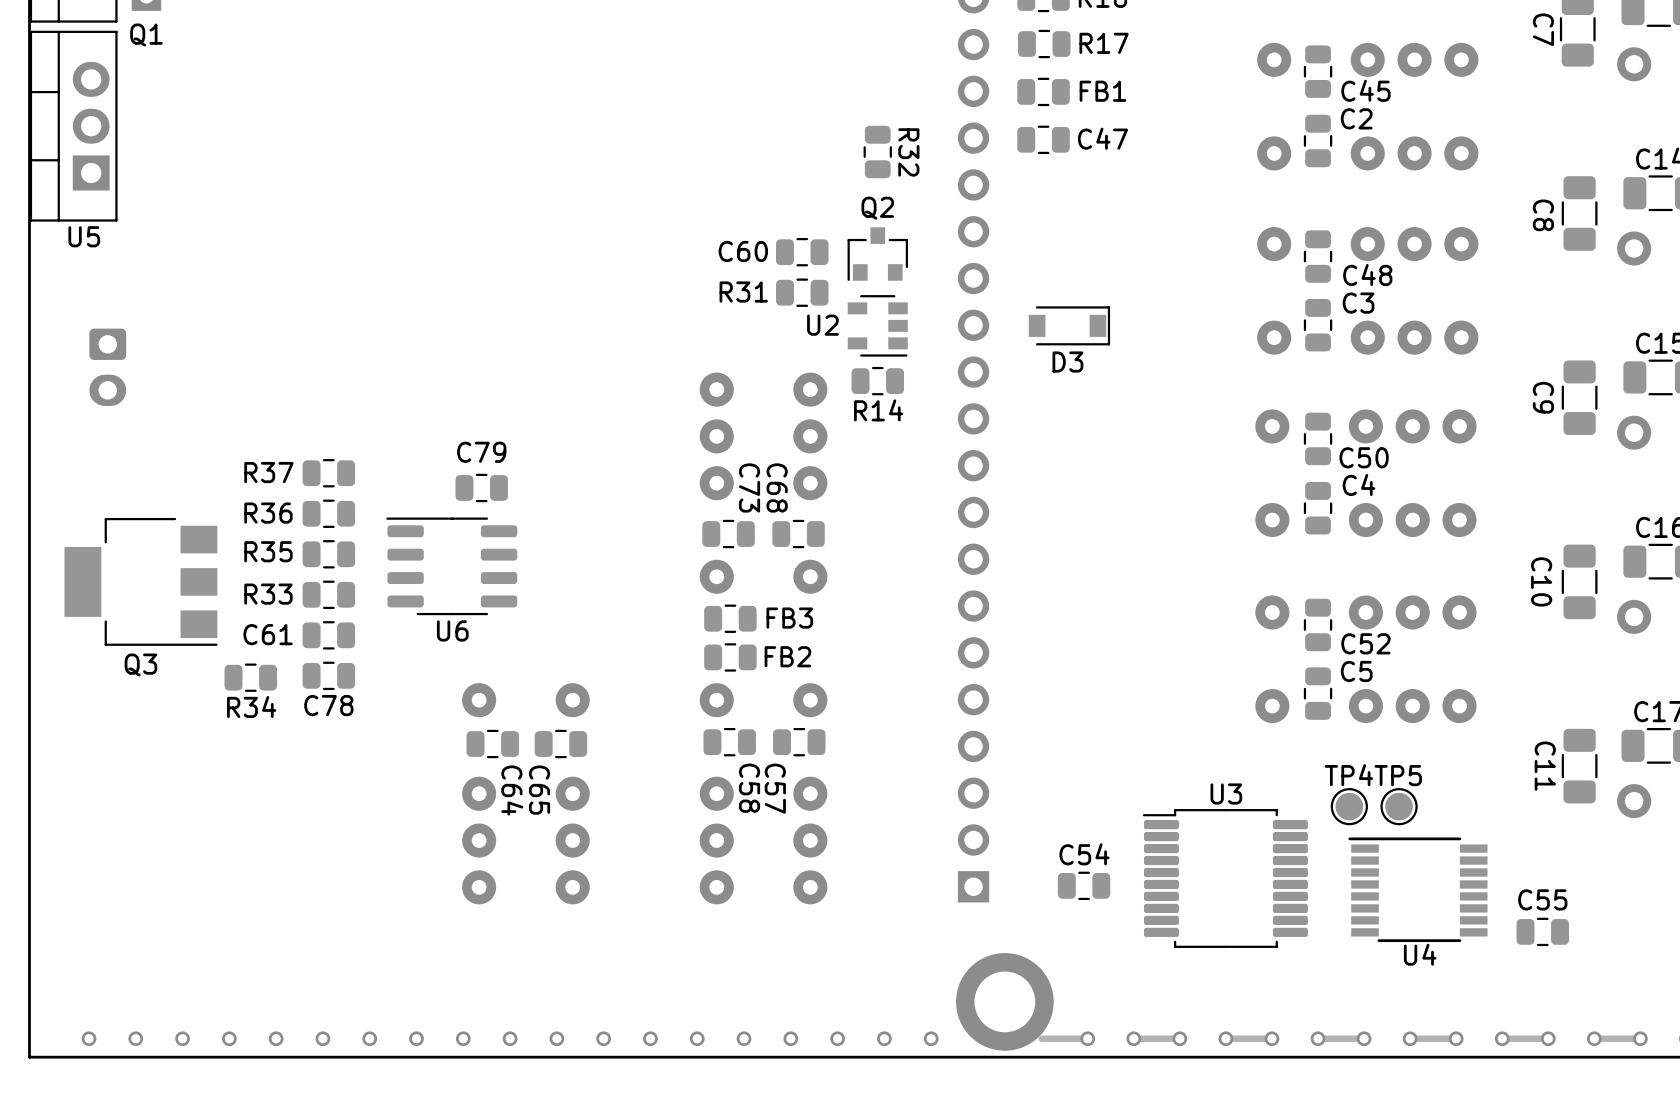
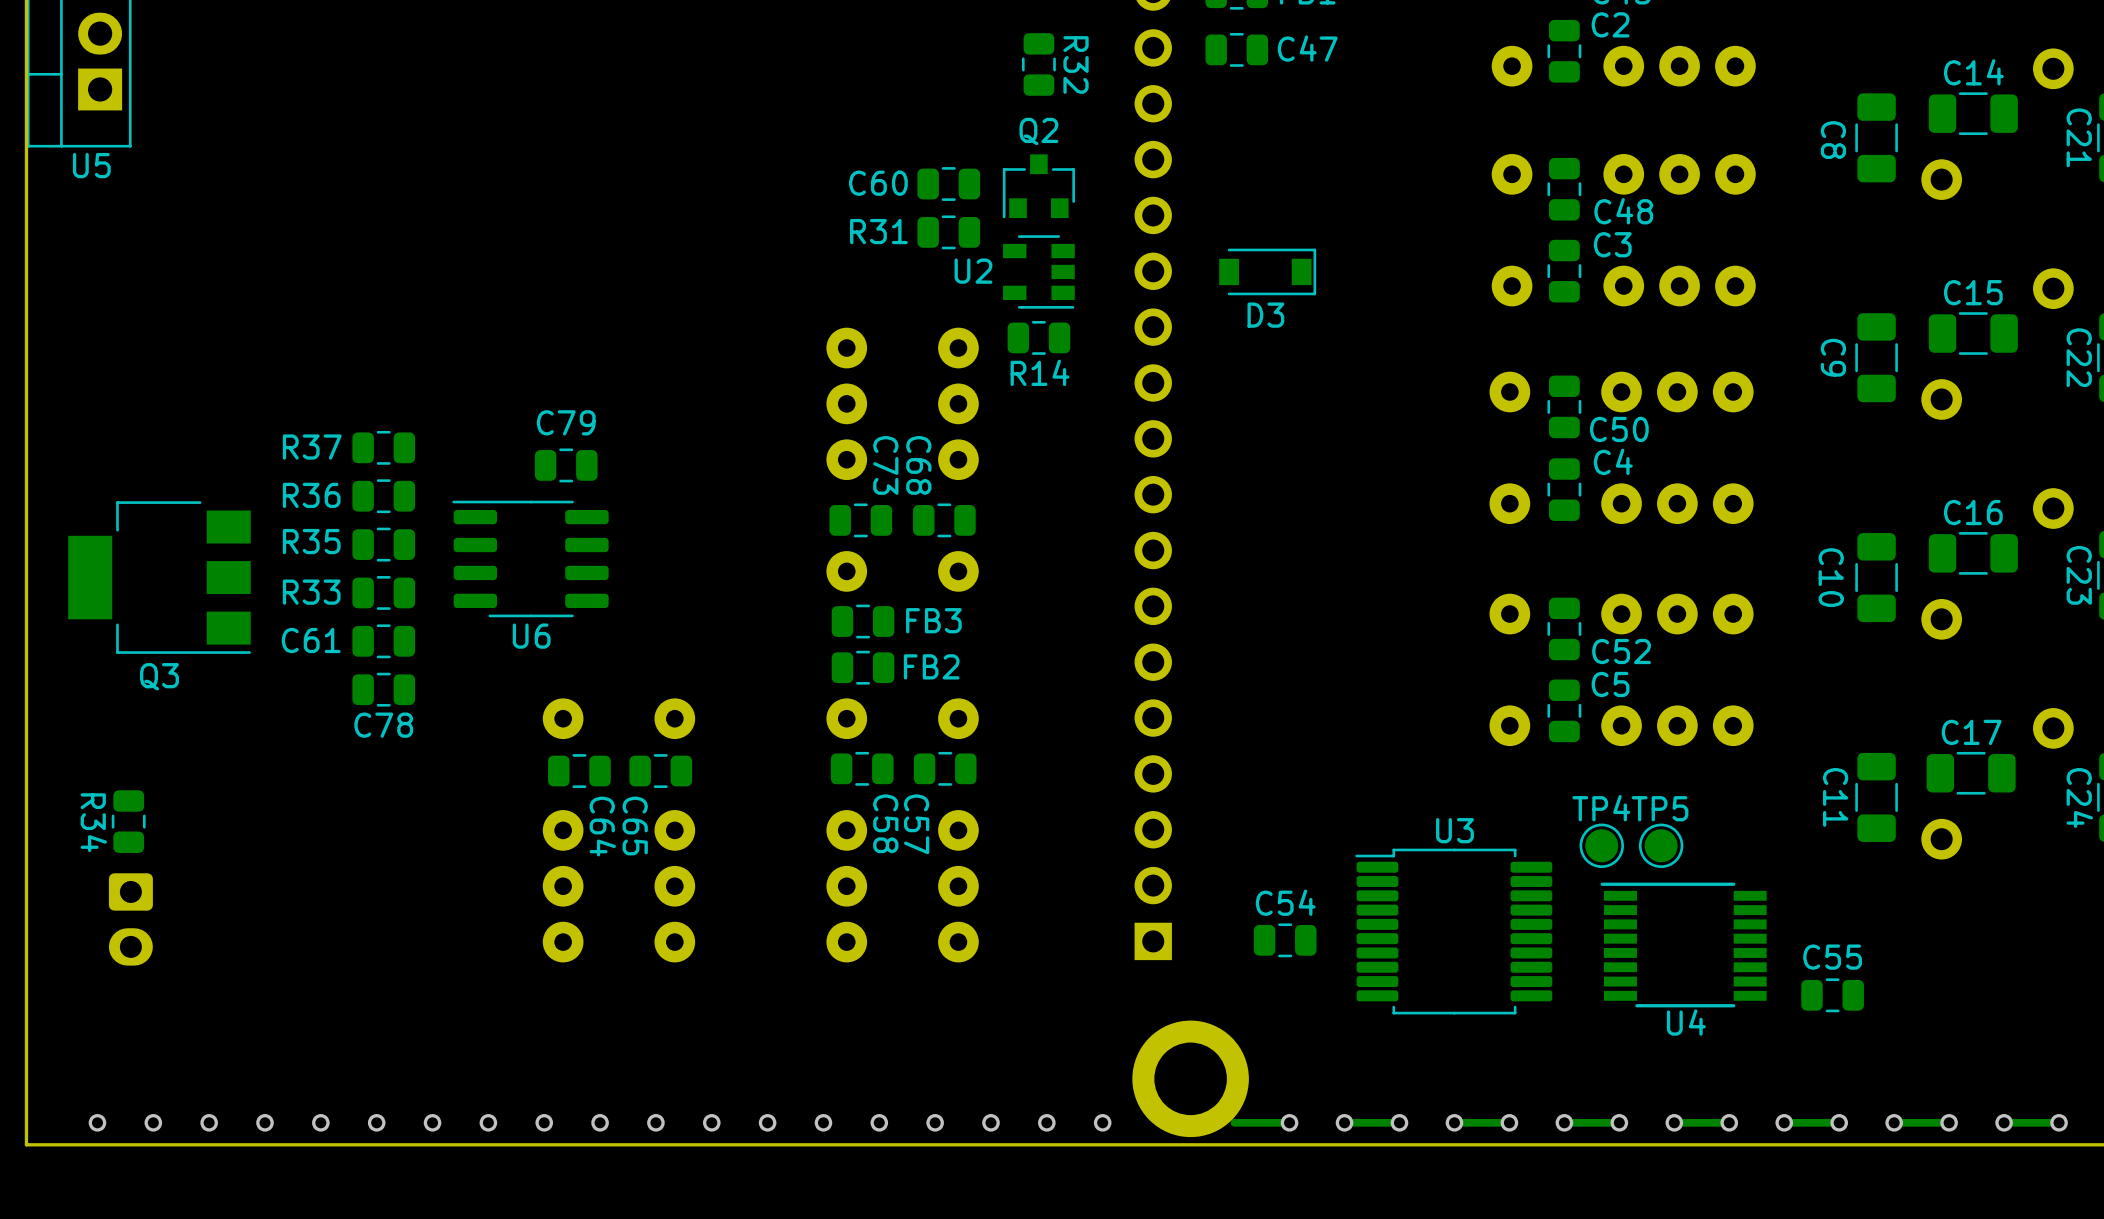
part: (107, 367) -> none
R34 rotation: 0° (250, 677) -> 90° clockwise (128, 821)
R34 position: (250, 677) -> (128, 821)
part: none -> (130, 919)

